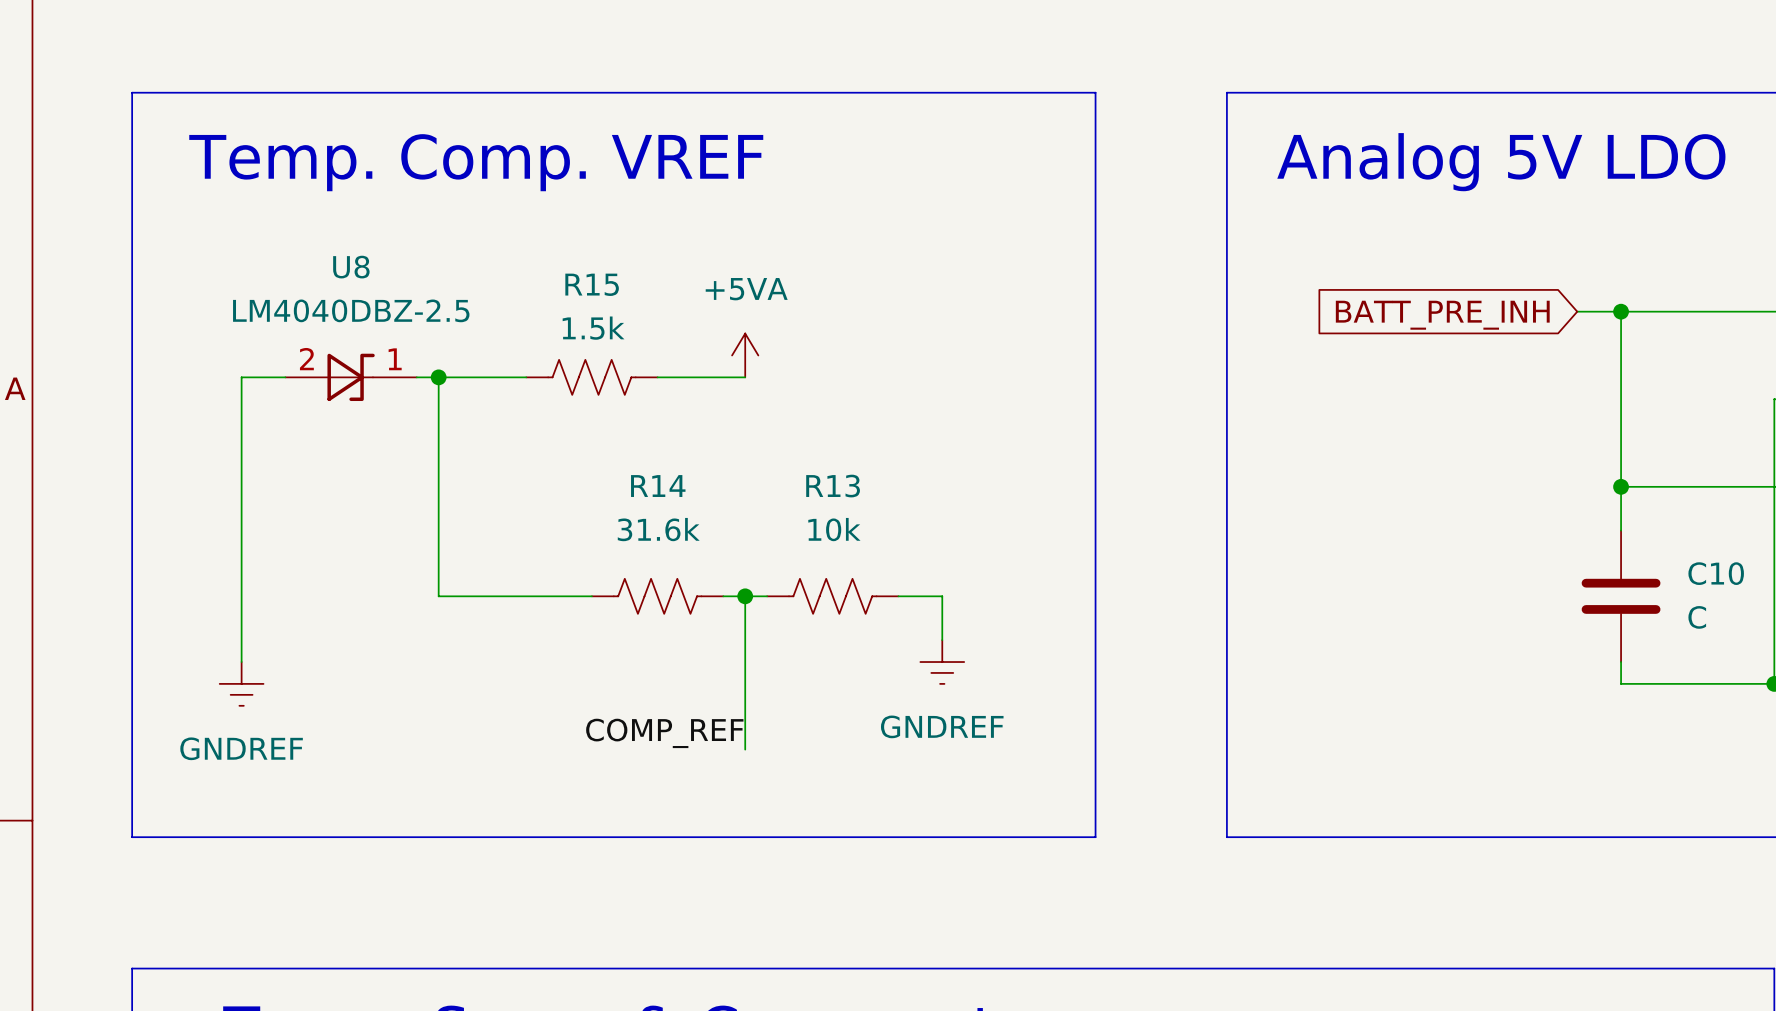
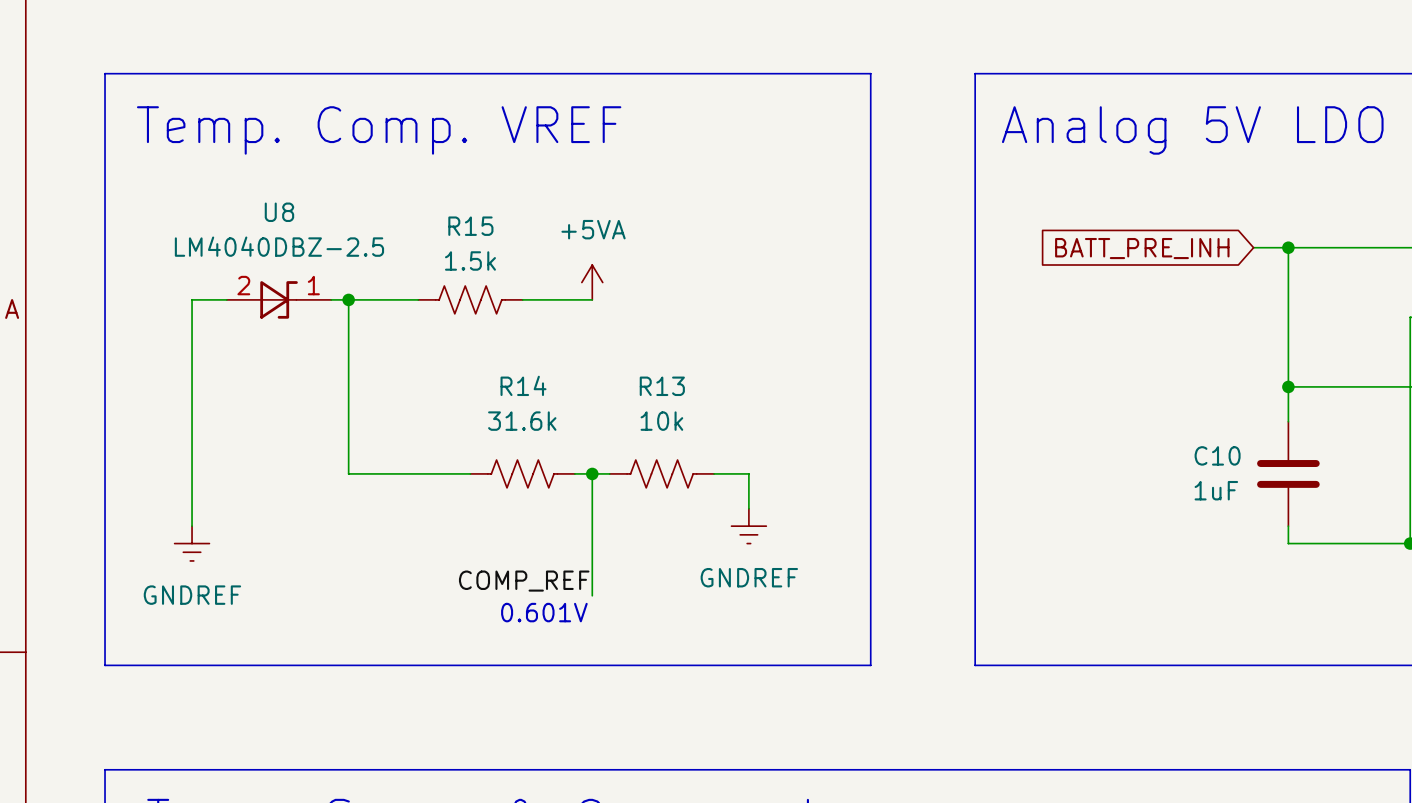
C10 name position: C10 (1716, 573) -> C10 (1217, 455)
C10 value: C (1697, 617) -> 1uF (1216, 490)
text: none -> 0.601V (544, 612)

